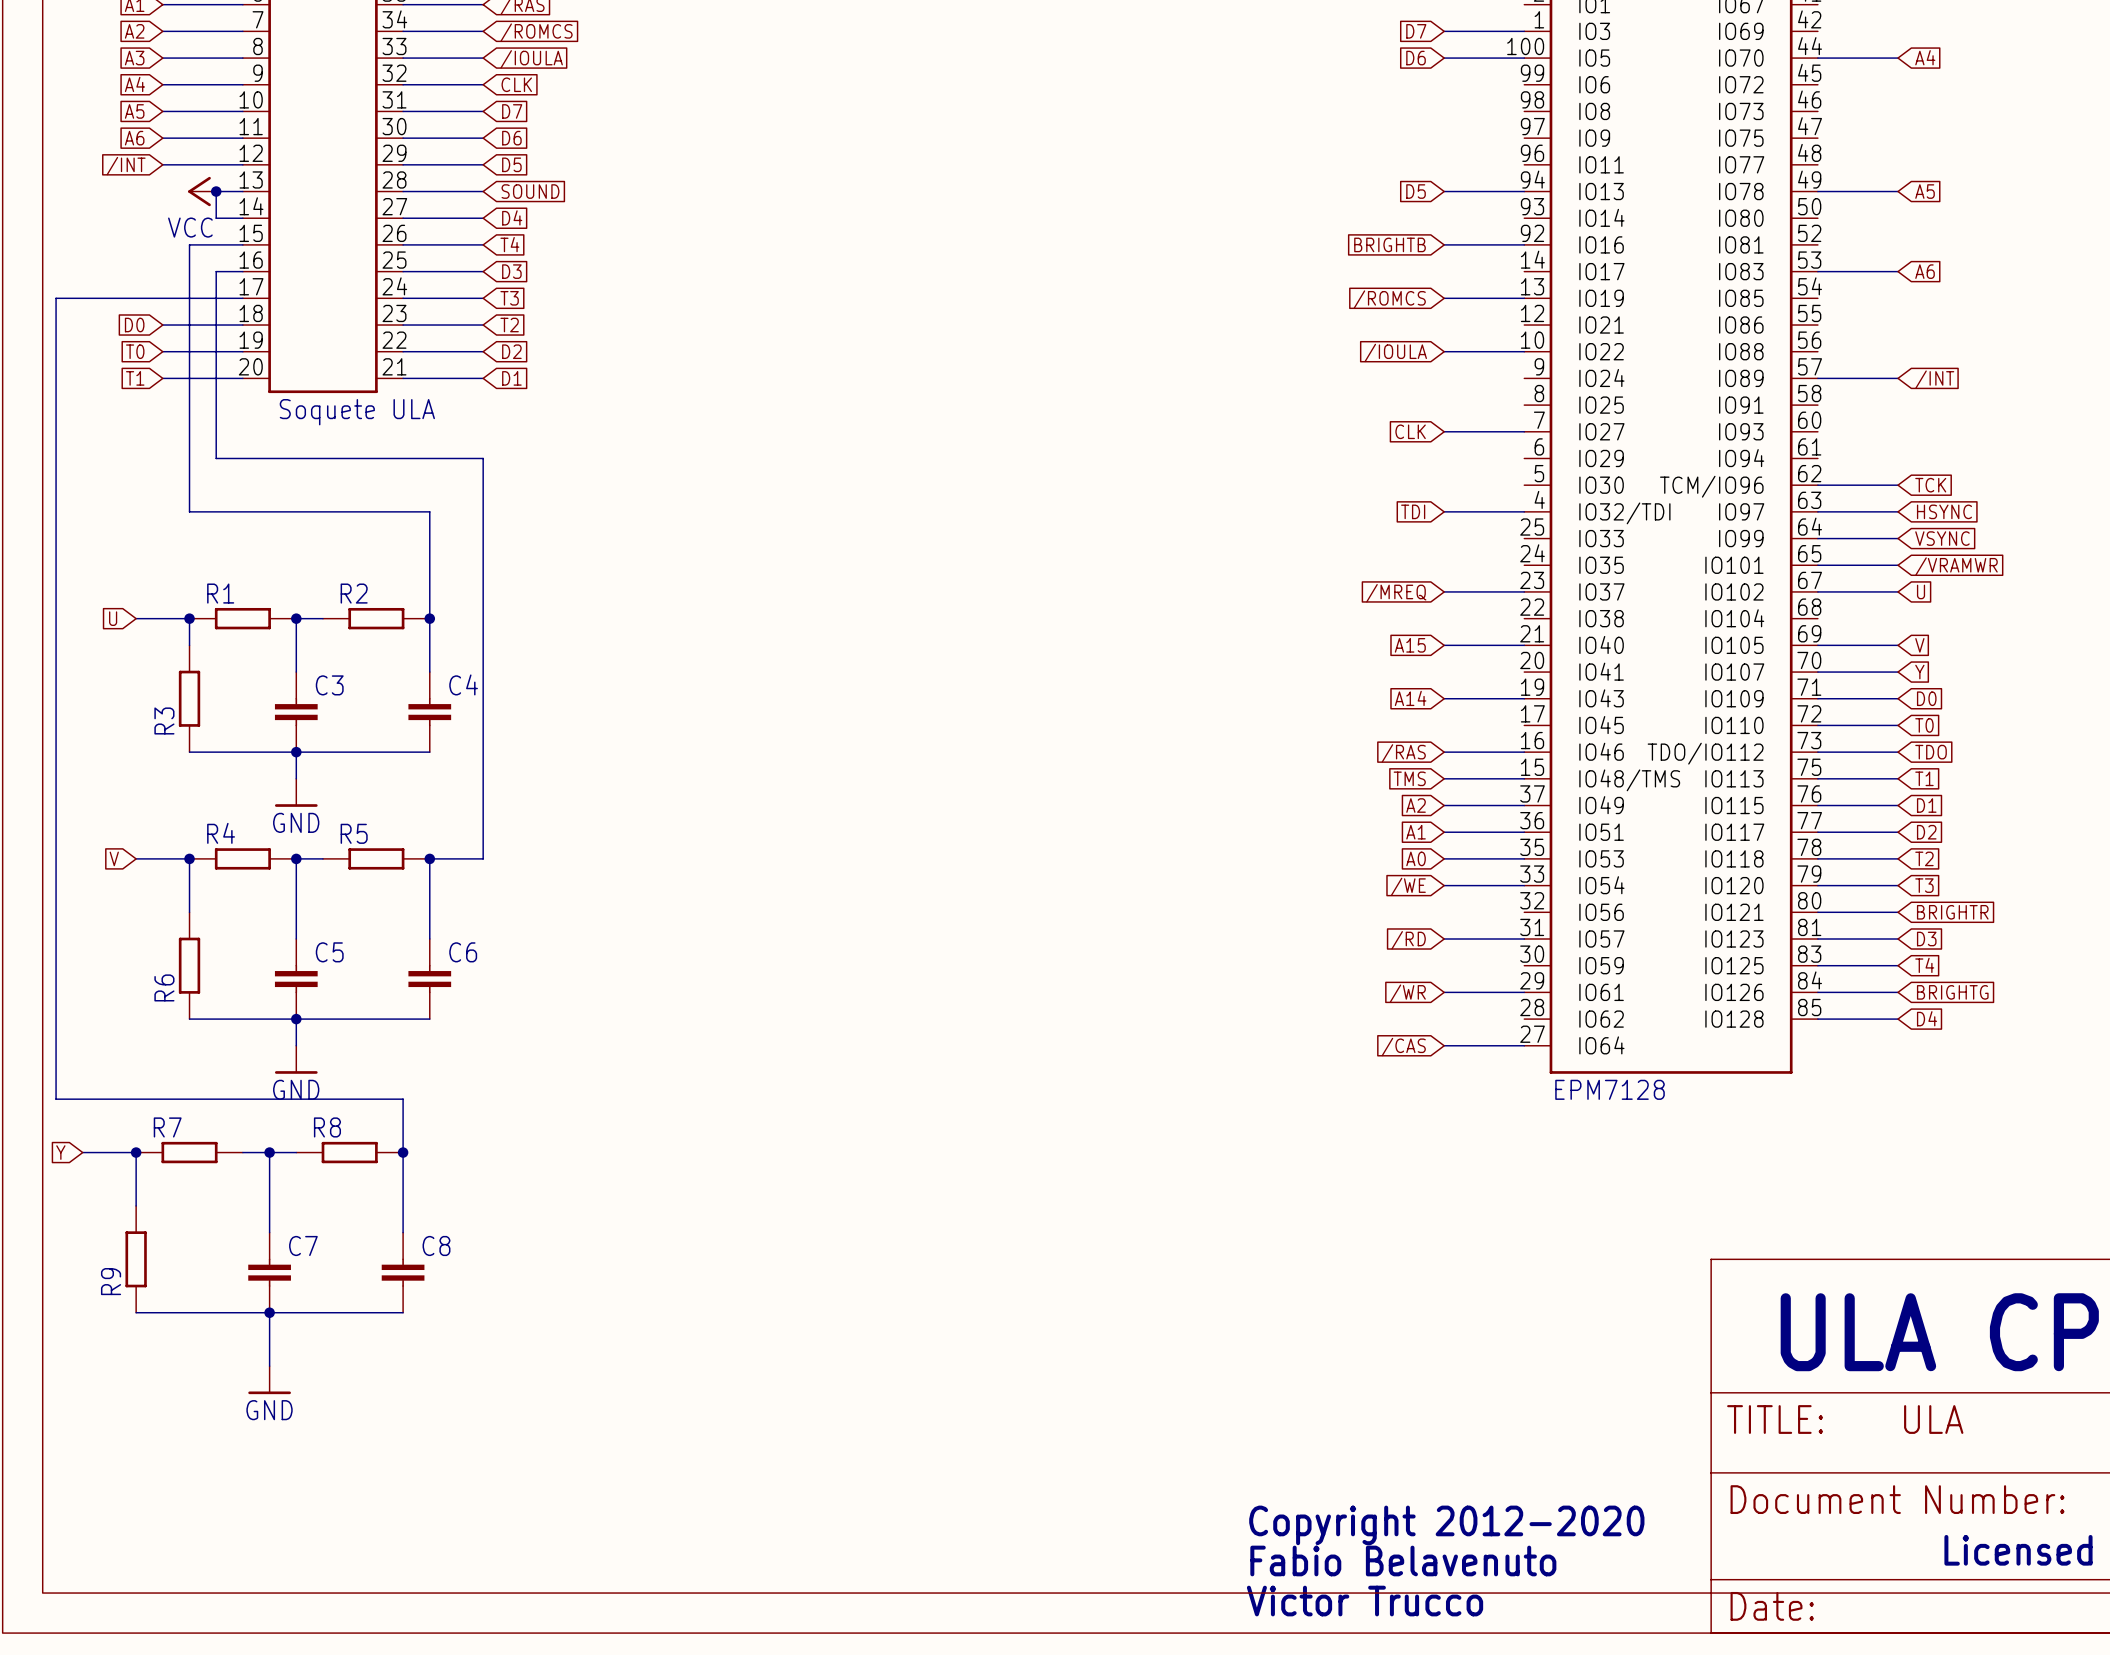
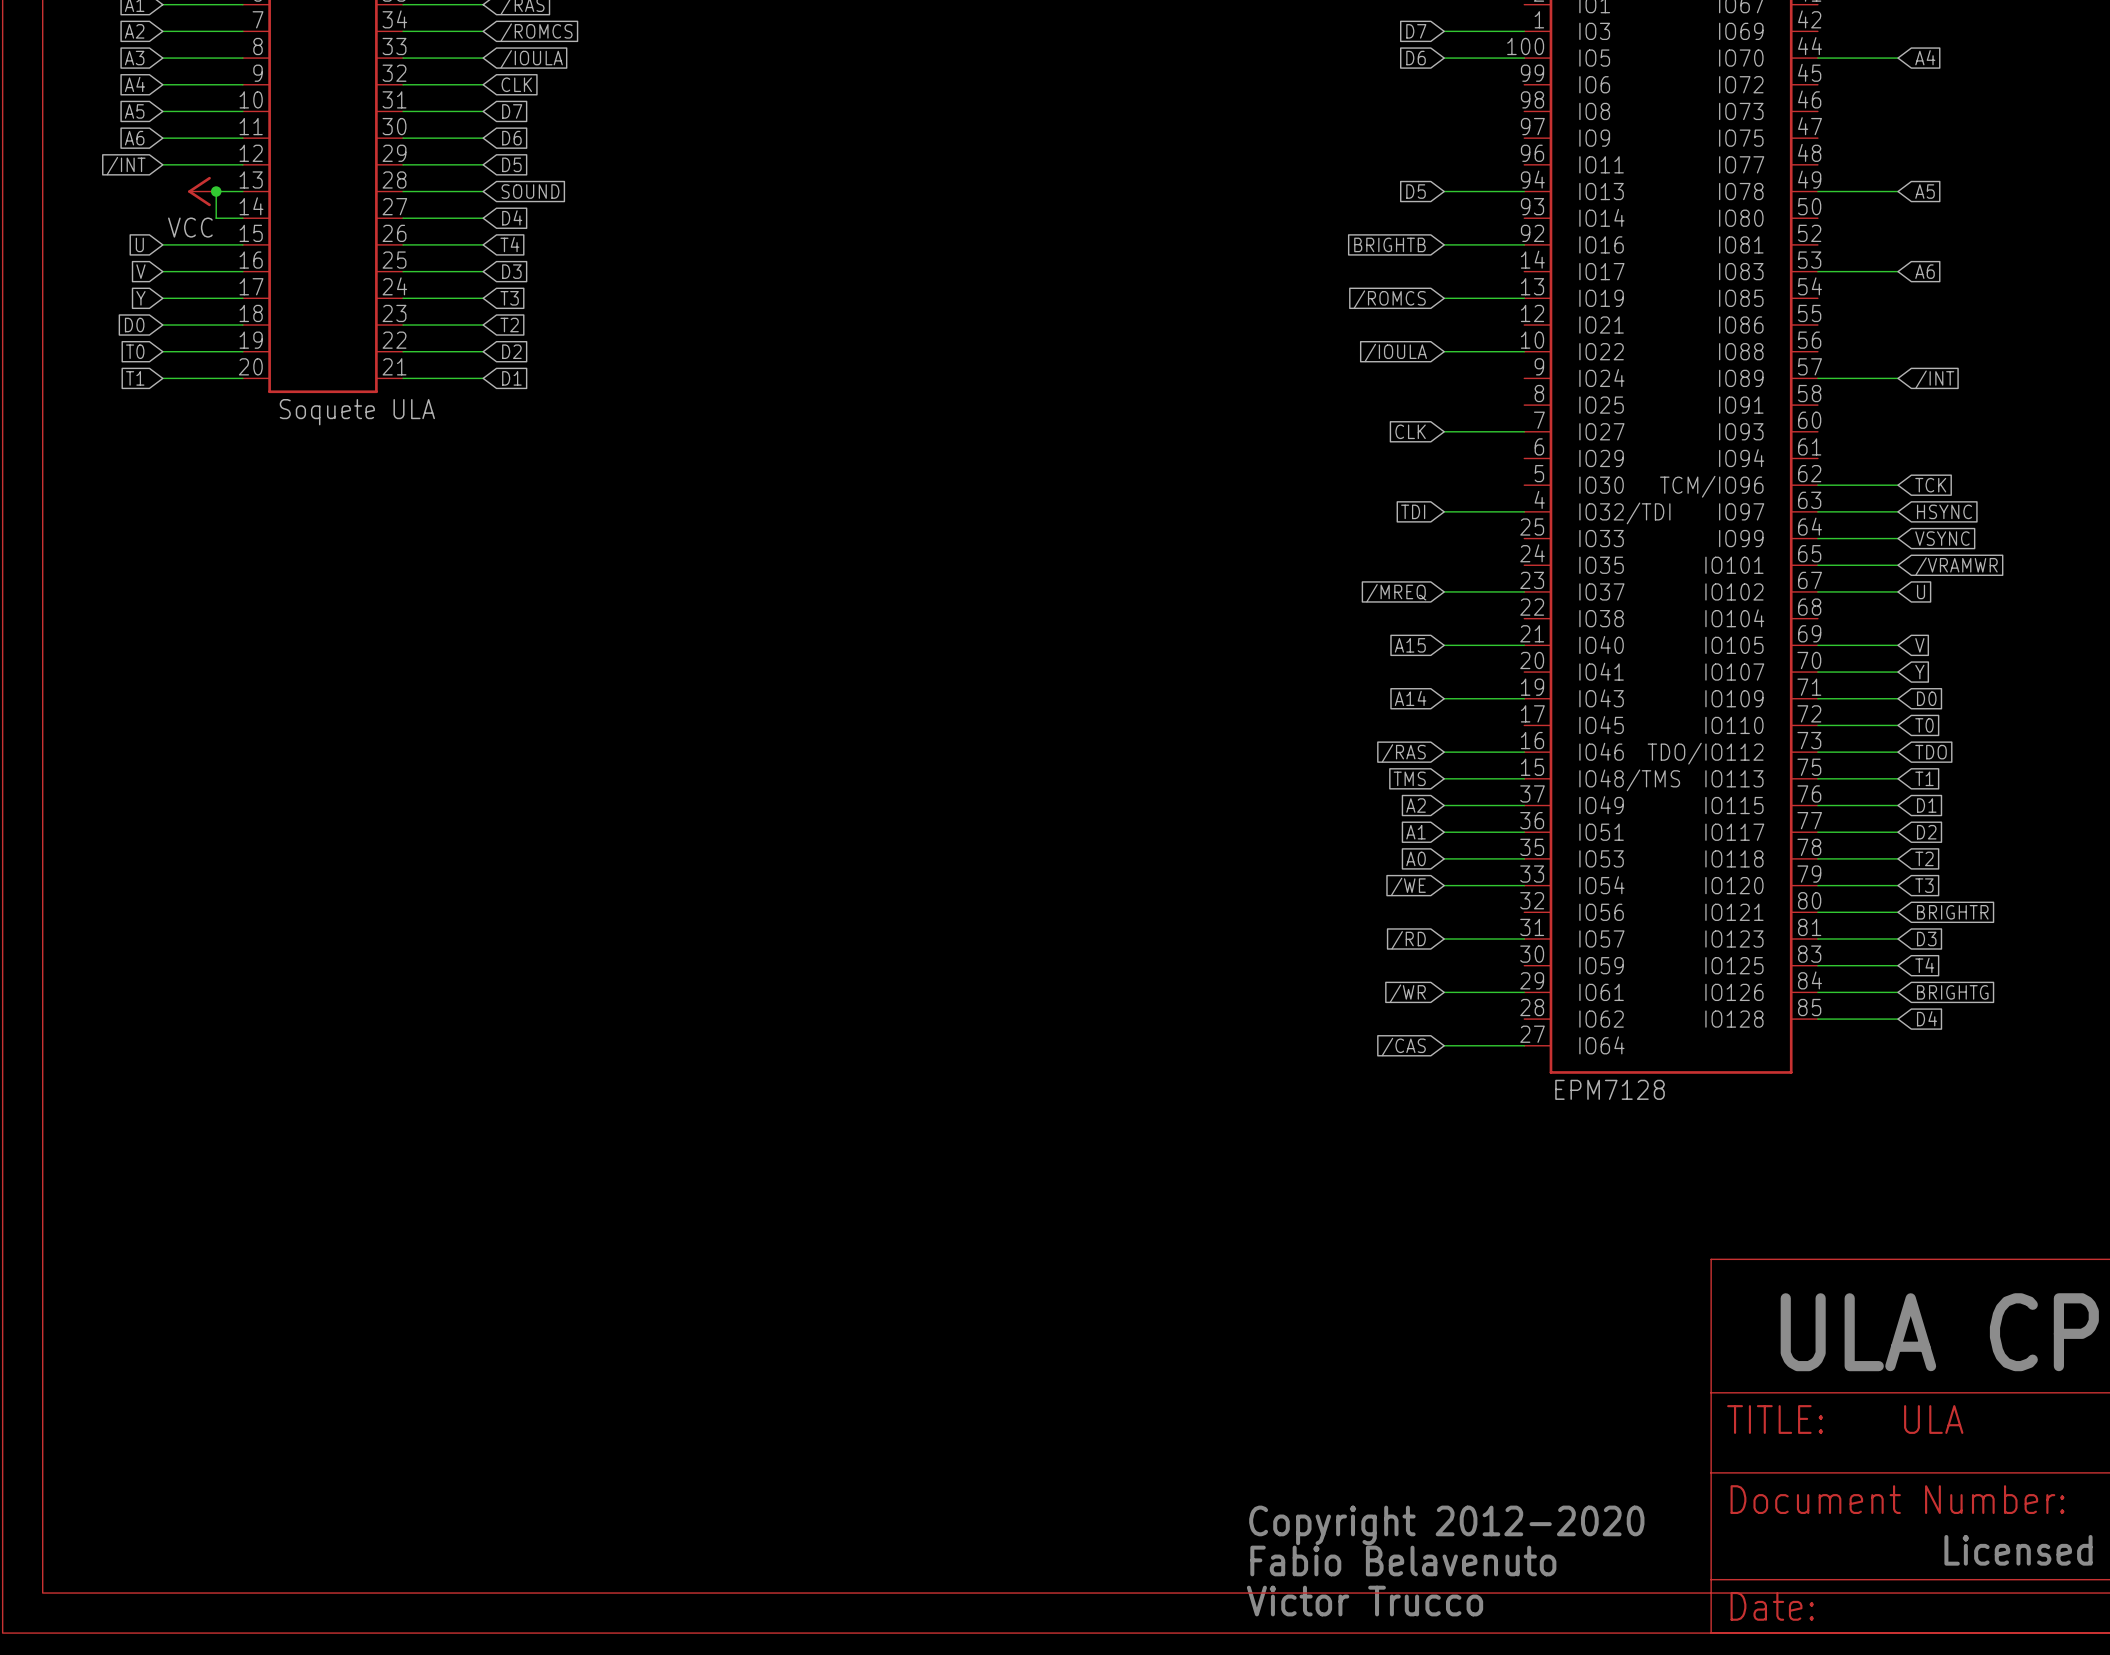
global label: none -> U (139, 244)
wire: (189, 244) (189, 511) (429, 511) (429, 672) -> (189, 244) (162, 244)
global label: none -> V (140, 271)
wire: (216, 271) (216, 458) (483, 458) (483, 858) (429, 858) (429, 938) -> (216, 271) (162, 271)
global label: none -> Y (140, 298)
wire: (162, 298) (56, 298) (56, 1099) (403, 1099) (403, 1232) -> none
global label: U (113, 618) -> none
wire: (136, 618) (189, 618) (189, 645) -> none
junction: (189, 618) -> none
R1: (242, 618) -> none
junction: (296, 618) -> none
wire: (323, 618) (296, 618) (296, 672) -> none
R2: (376, 618) -> none
junction: (429, 618) -> none
R3: (189, 698) -> none
C3: (296, 712) -> none
C4: (429, 712) -> none
wire: (189, 752) (429, 752) -> none
wire: (296, 752) (296, 778) -> none
junction: (296, 752) -> none
power symbol: GND (296, 792) -> none
global label: V (114, 858) -> none
wire: (136, 858) (189, 858) (189, 912) -> none
junction: (189, 858) -> none
R4: (242, 858) -> none
junction: (296, 858) -> none
wire: (323, 858) (296, 858) (296, 938) -> none
R5: (376, 858) -> none
junction: (429, 858) -> none
R6: (189, 965) -> none
C5: (296, 979) -> none
C6: (429, 979) -> none
wire: (189, 1019) (429, 1019) -> none
wire: (296, 1019) (296, 1045) -> none
junction: (296, 1019) -> none
power symbol: GND (296, 1059) -> none
global label: Y (60, 1152) -> none
wire: (82, 1152) (136, 1152) (136, 1205) -> none
junction: (136, 1152) -> none
R7: (189, 1152) -> none
wire: (242, 1152) (296, 1152) -> none
wire: (269, 1152) (269, 1232) -> none
junction: (269, 1152) -> none
R8: (349, 1152) -> none
junction: (403, 1152) -> none
R9: (136, 1259) -> none
C7: (269, 1272) -> none
C8: (403, 1272) -> none
wire: (136, 1312) (403, 1312) -> none
wire: (269, 1312) (269, 1366) -> none
junction: (269, 1312) -> none
power symbol: GND (269, 1380) -> none

